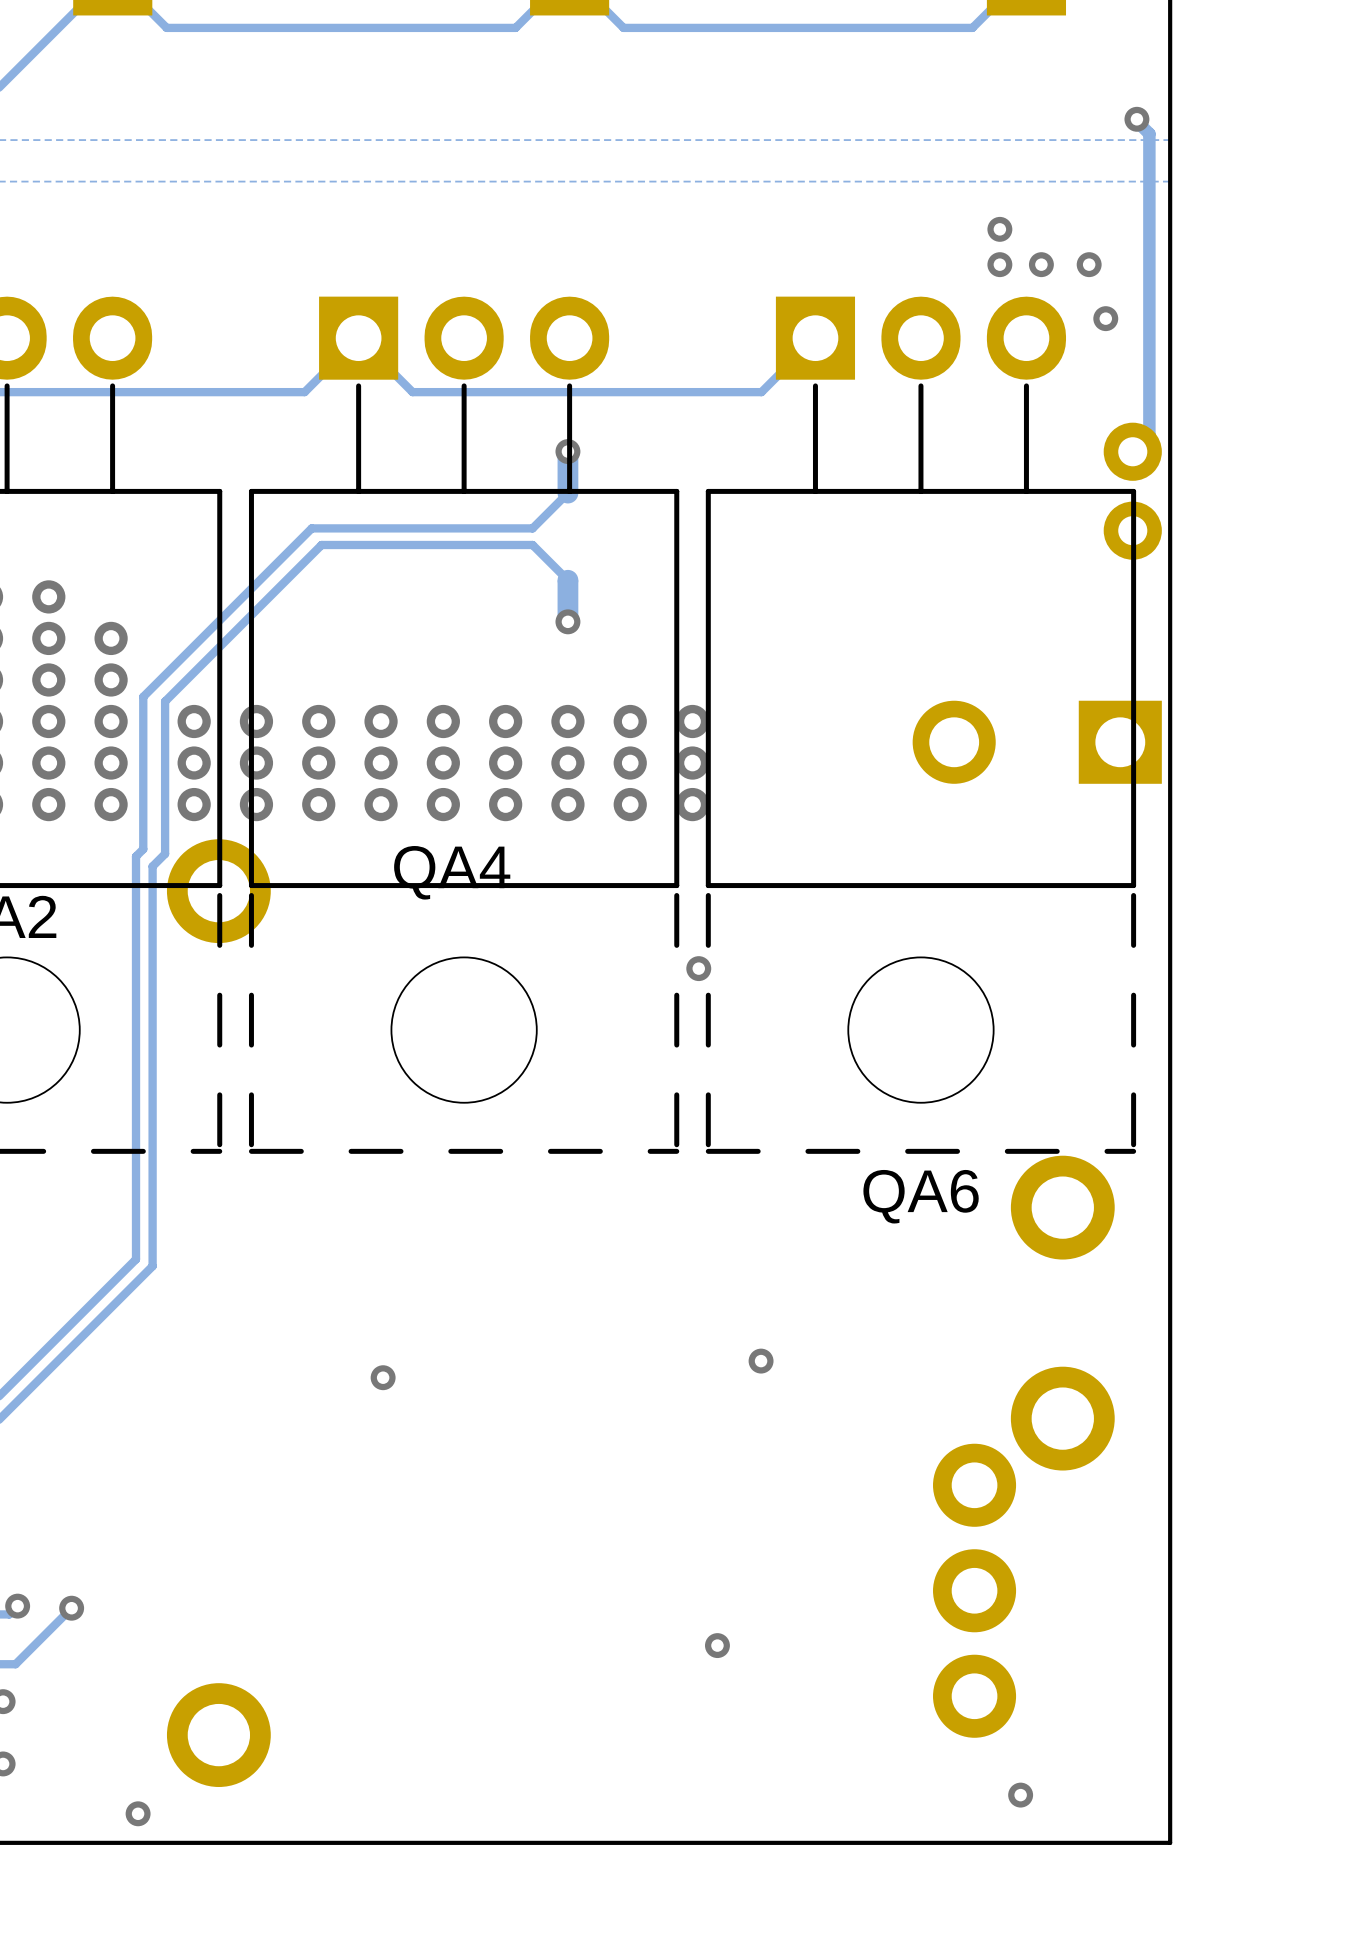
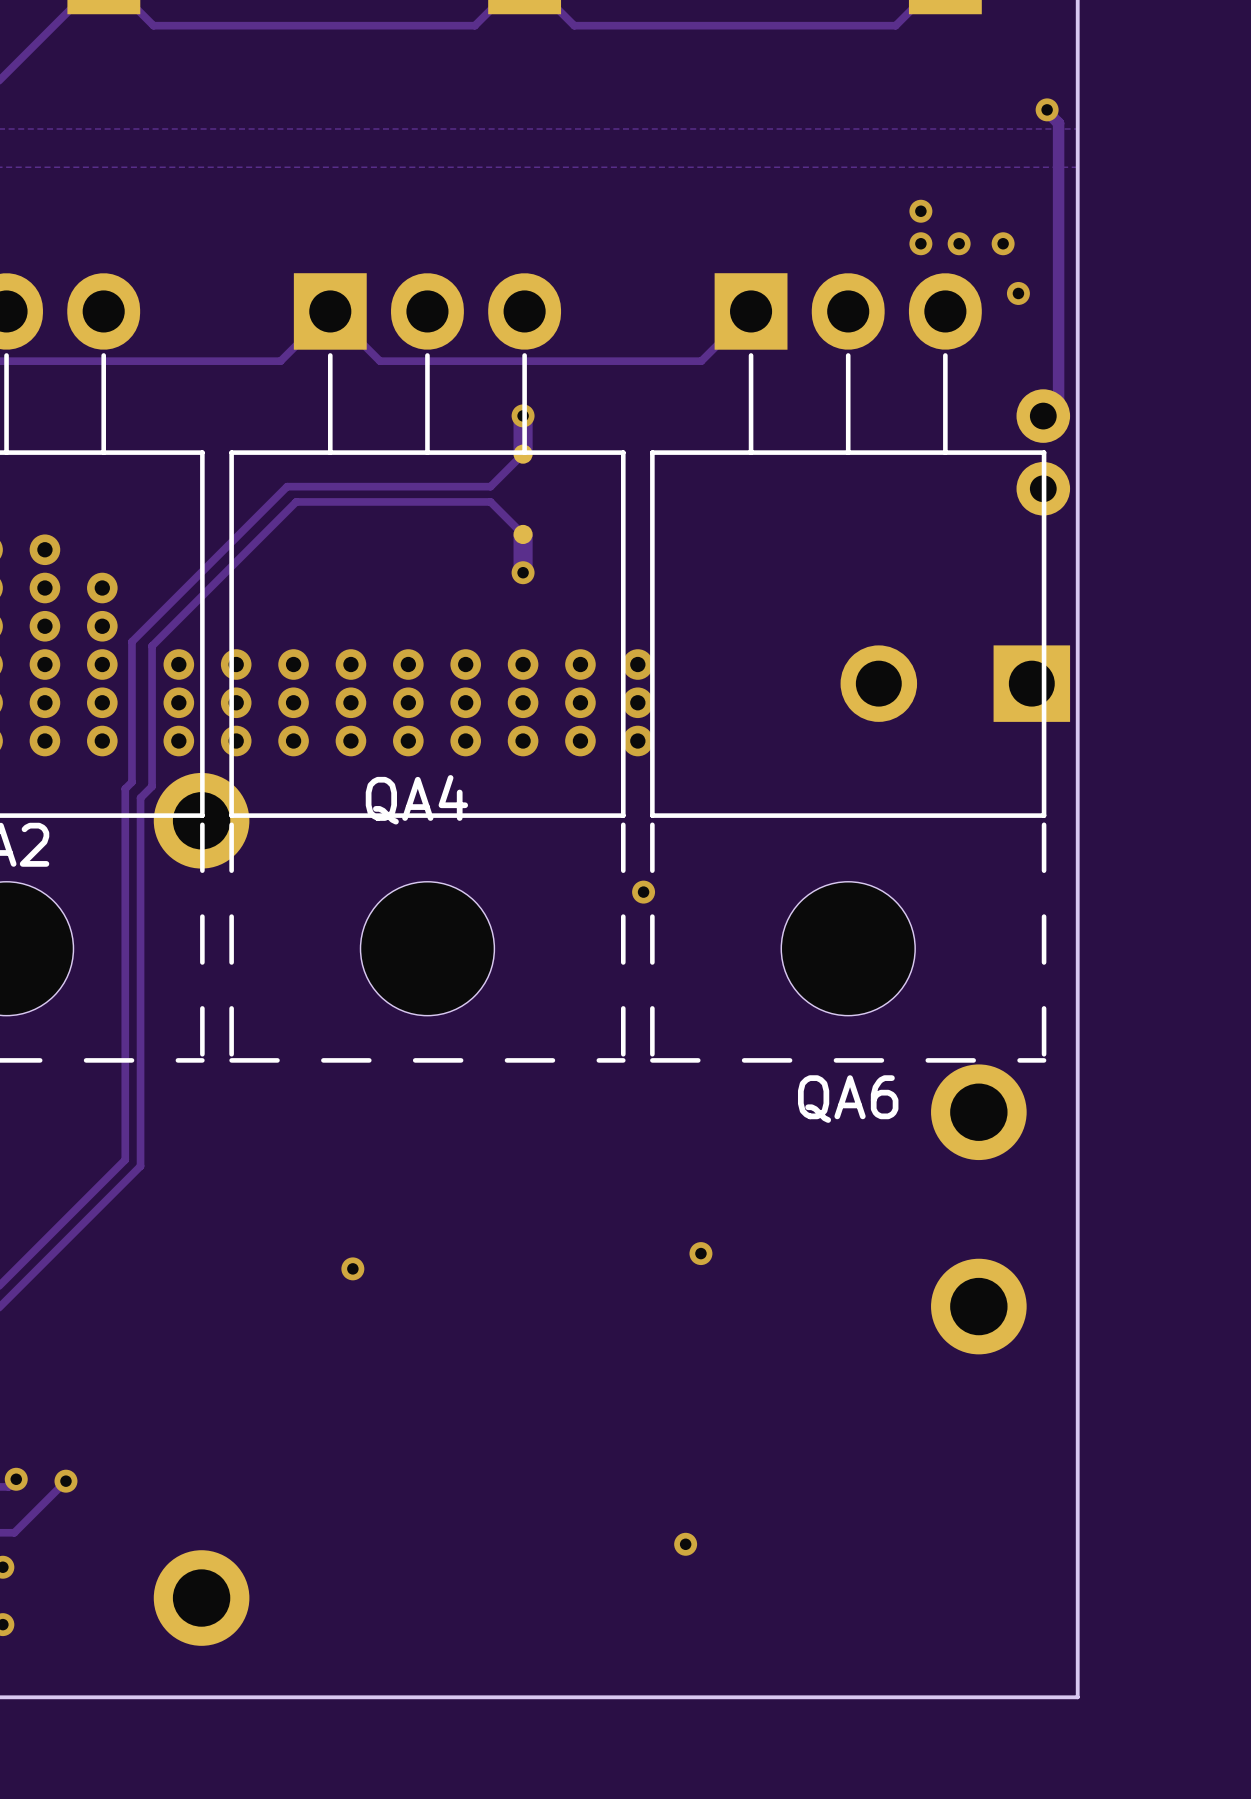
part: (974, 1590) -> none
via position: (717, 1645) -> (685, 1544)
via: (1020, 1795) -> none
via: (138, 1813) -> none

